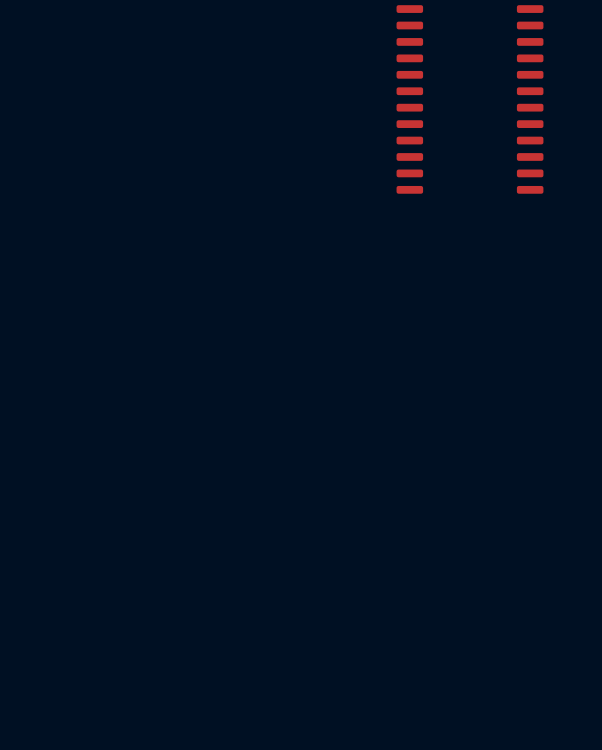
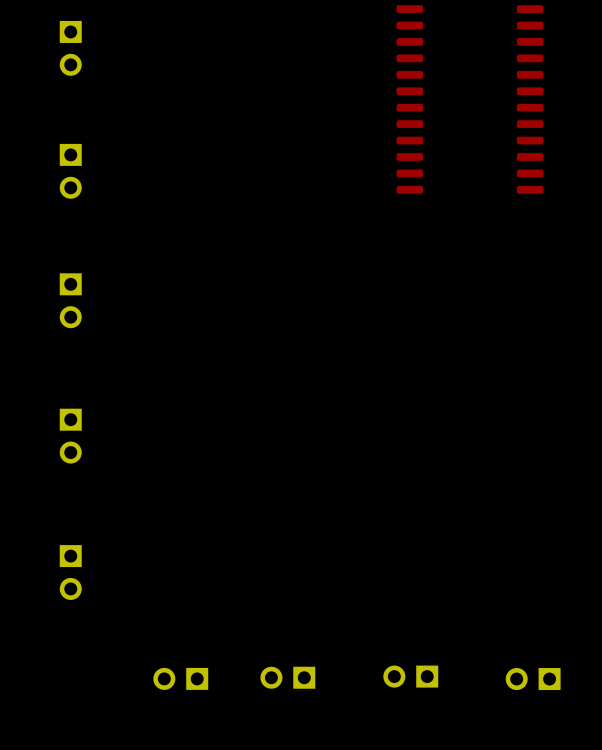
part: none -> (70, 48)
part: none -> (70, 171)
part: none -> (70, 300)
part: none -> (70, 436)
part: none -> (70, 572)
part: none -> (410, 676)
part: none -> (287, 677)
part: none -> (180, 678)
part: none -> (533, 679)

